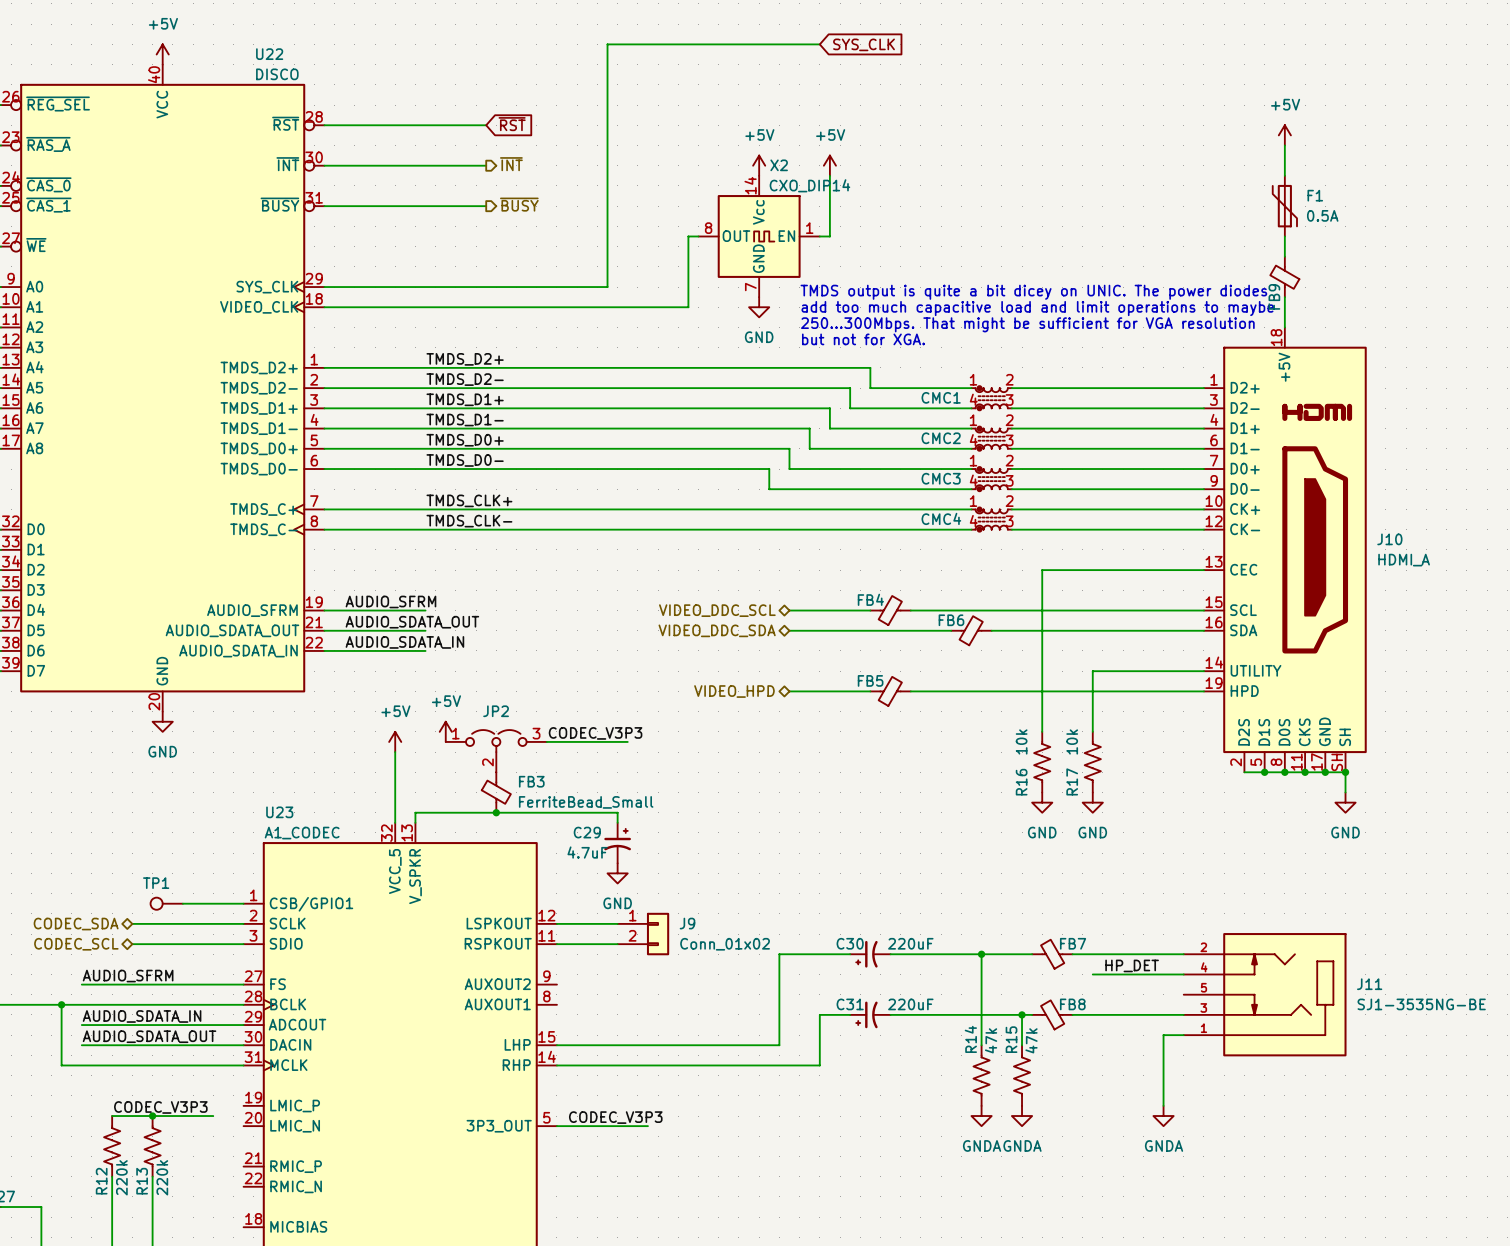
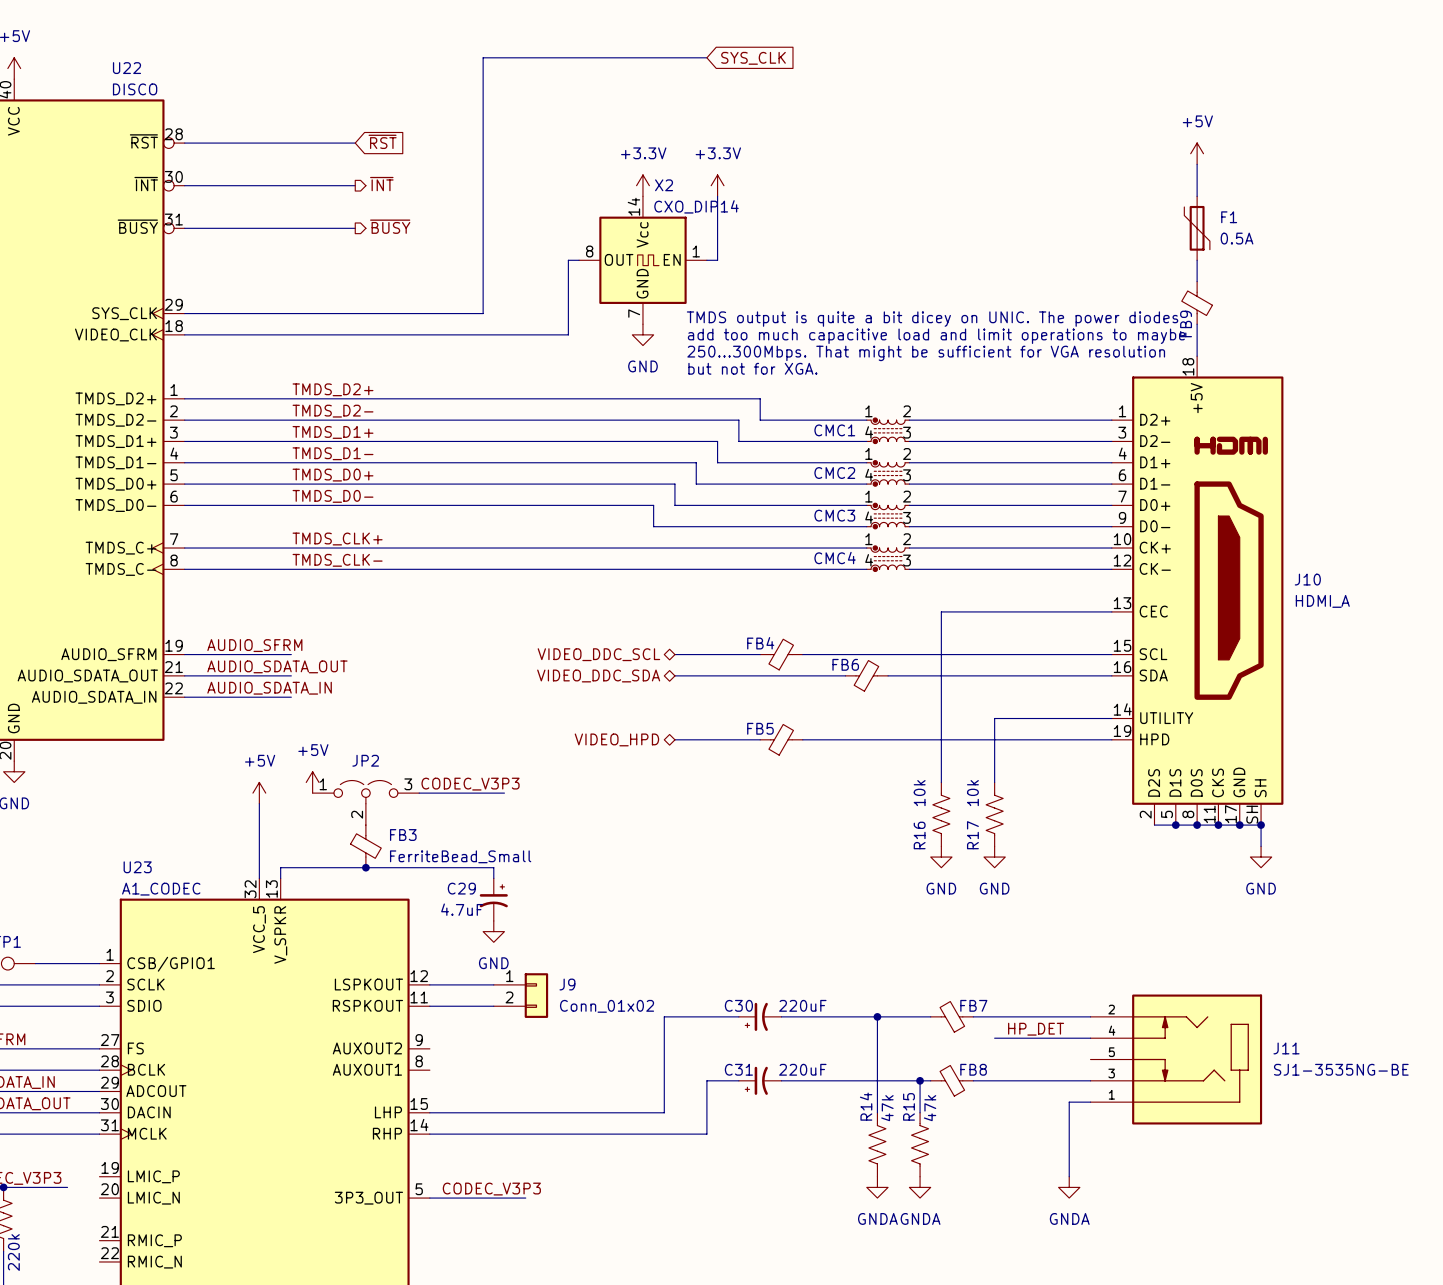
power symbol: +5V (759, 165) -> +3.3V (642, 185)
power symbol: +5V (829, 165) -> +3.3V (717, 185)

